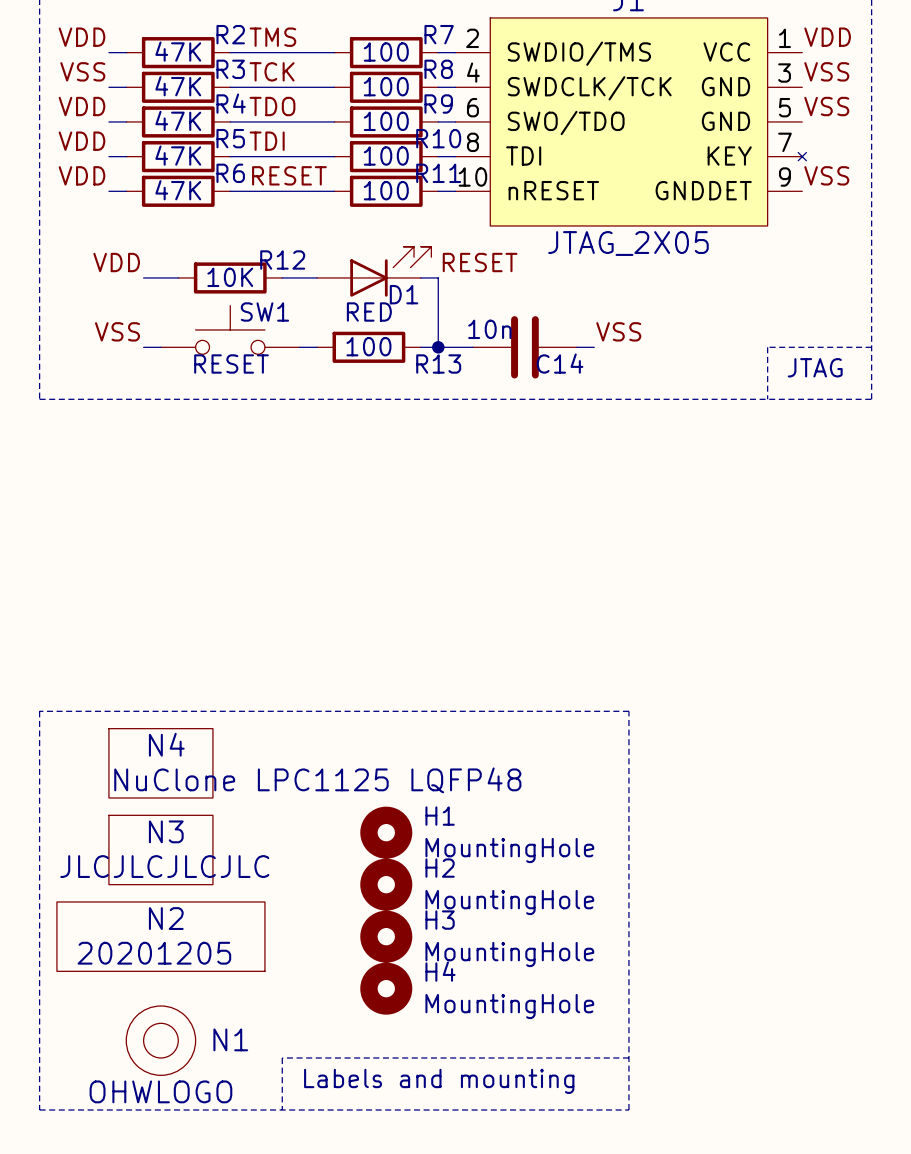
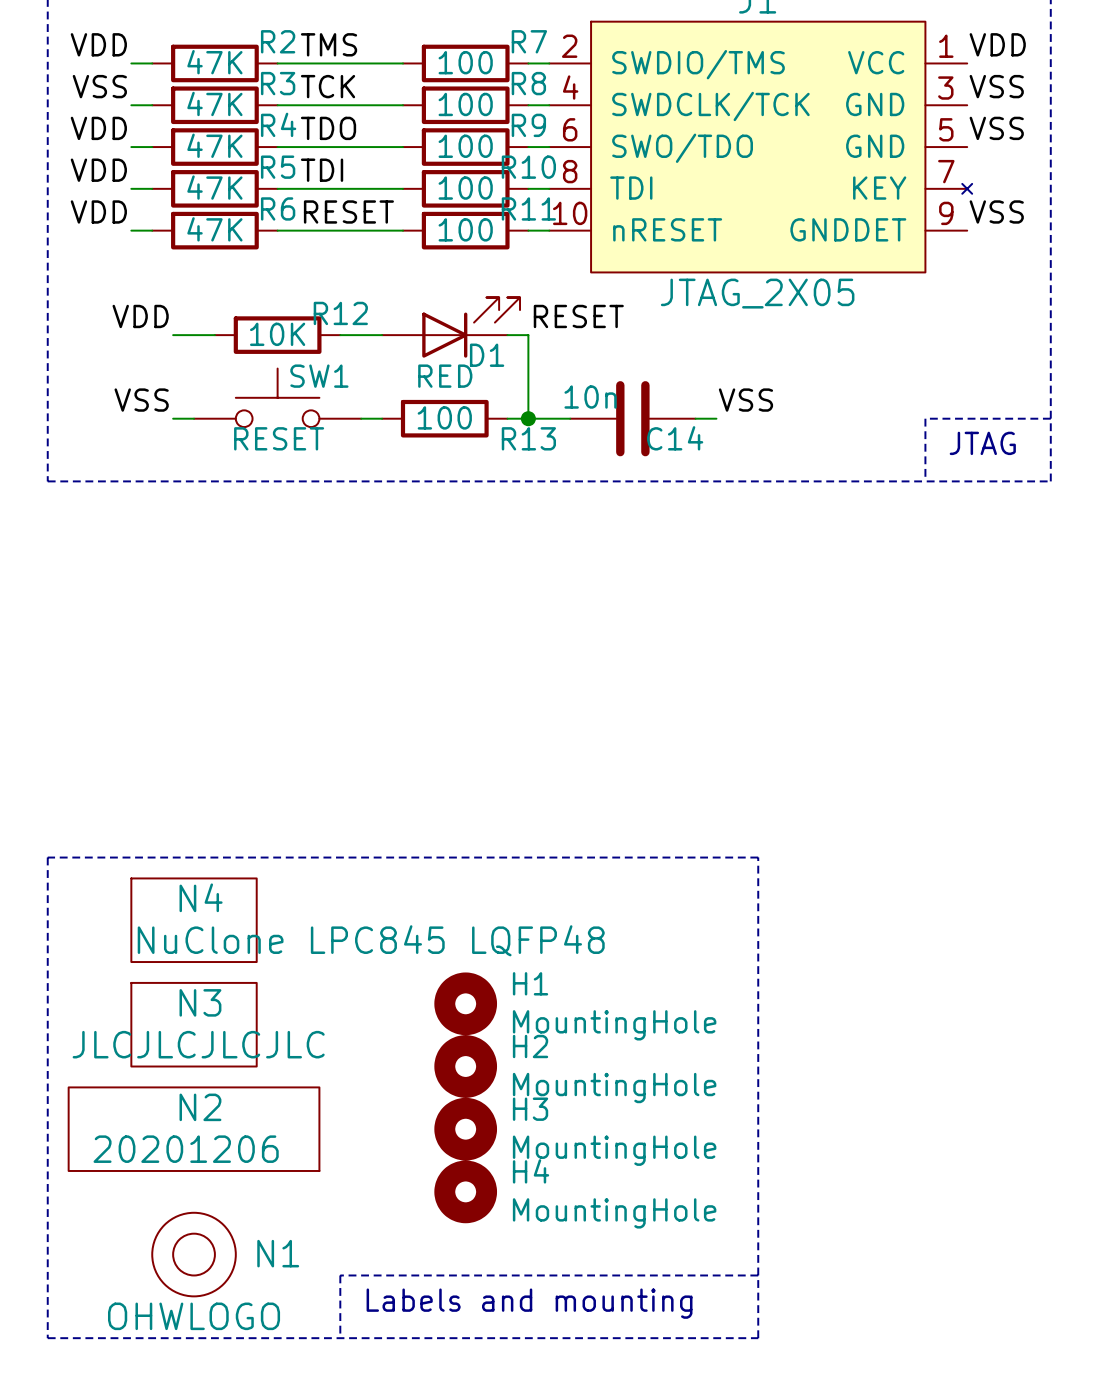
N4 value: NuClone LPC1125 LQFP48 (317, 780) -> NuClone LPC845 LQFP48 (371, 940)
N2 value: 20201205 (154, 953) -> 20201206 (186, 1149)

